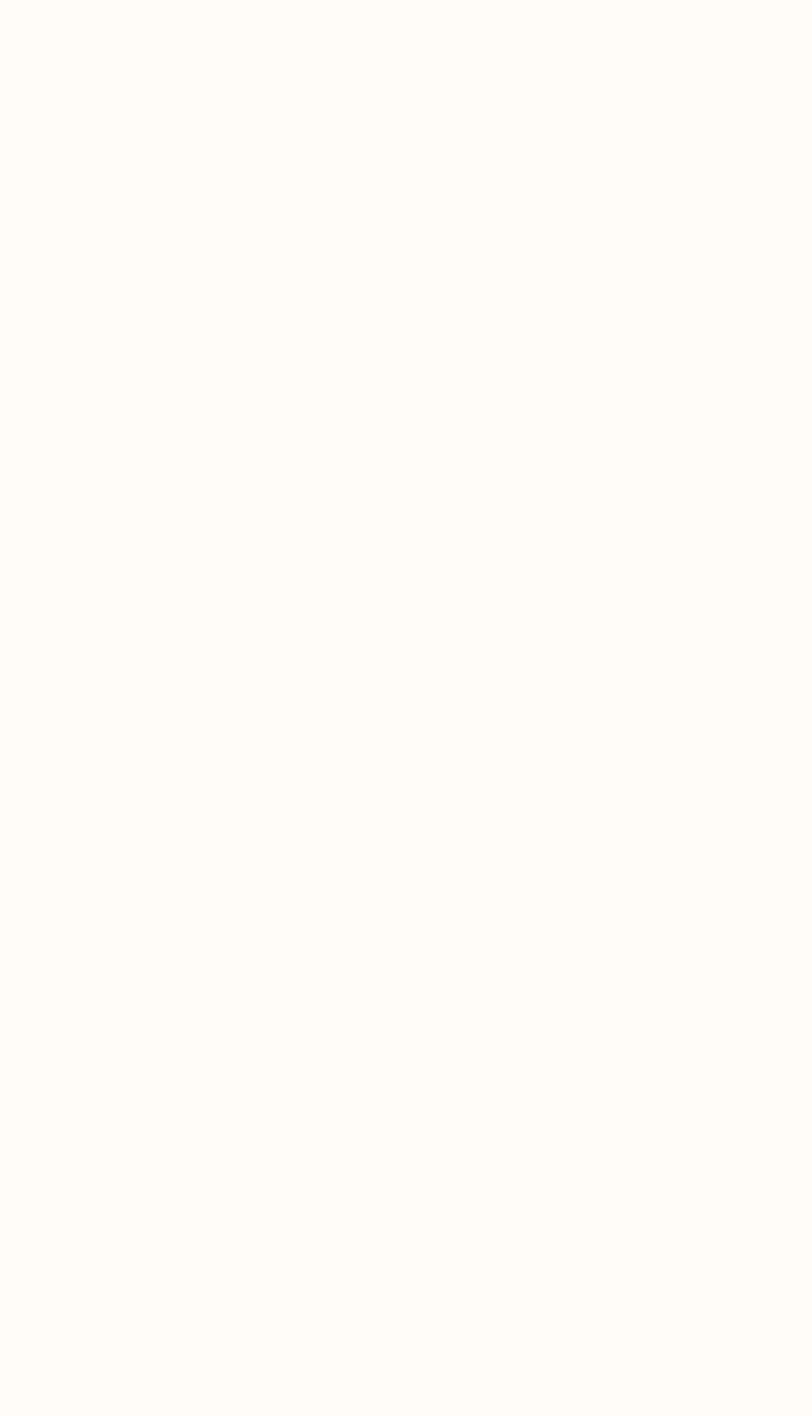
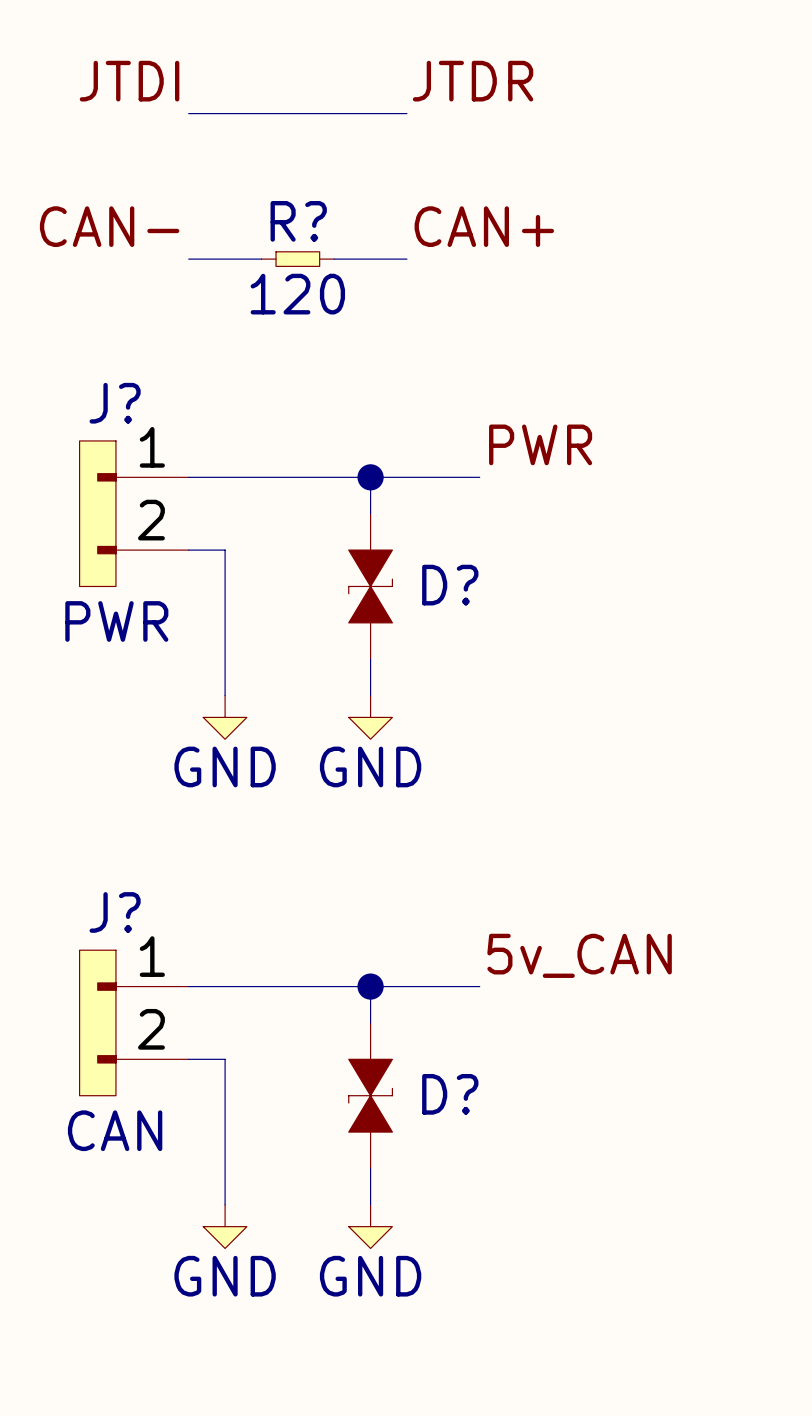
label: none -> JTDI (129, 81)
label: none -> JTDR (473, 81)
wire: none -> (188, 113) (406, 113)
label: none -> CAN- (109, 226)
label: none -> CAN+ (484, 226)
wire: none -> (188, 259) (261, 259)
R?: none -> 120 (297, 259)
wire: none -> (334, 259) (406, 259)
label: none -> PWR (540, 444)
wire: none -> (188, 477) (479, 477)
wire: none -> (370, 477) (370, 513)
junction: none -> (370, 477)
J?: none -> PWR (134, 513)
wire: none -> (188, 550) (225, 550) (225, 695)
D?: none -> (370, 586)
wire: none -> (370, 659) (370, 695)
power symbol: none -> GND (225, 717)
power symbol: none -> GND (370, 717)
label: none -> 5v_CAN (579, 955)
wire: none -> (188, 986) (479, 986)
wire: none -> (370, 986) (370, 1022)
junction: none -> (370, 986)
J?: none -> CAN (134, 1022)
wire: none -> (188, 1059) (225, 1059) (225, 1204)
D?: none -> (370, 1095)
wire: none -> (370, 1168) (370, 1204)
power symbol: none -> GND (225, 1226)
power symbol: none -> GND (370, 1226)

